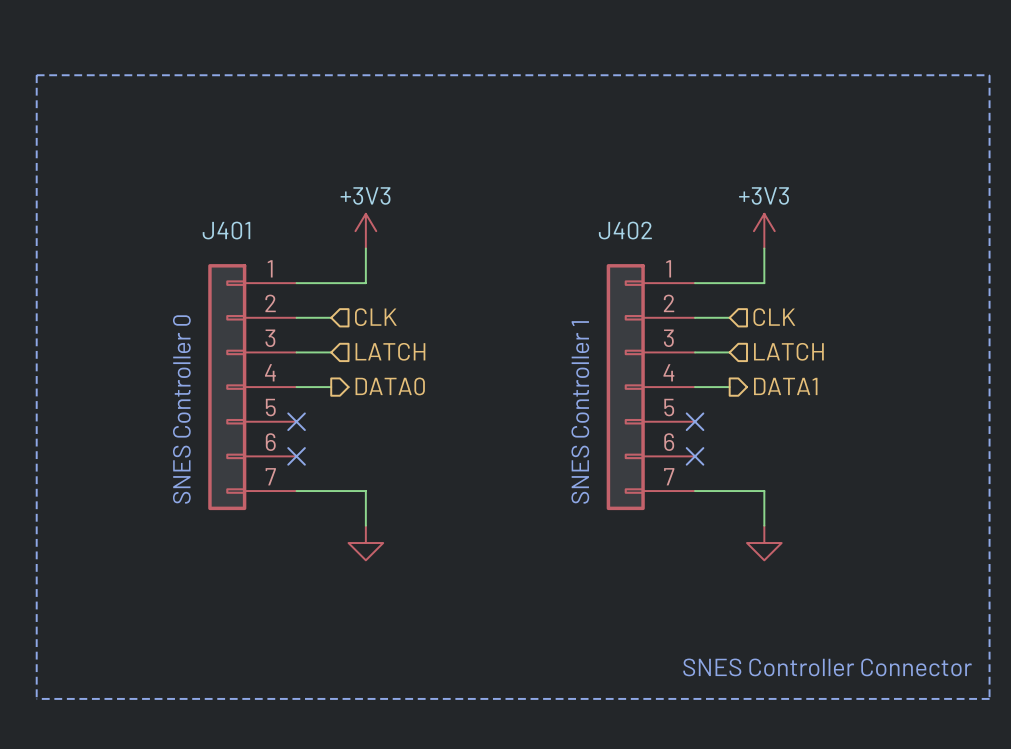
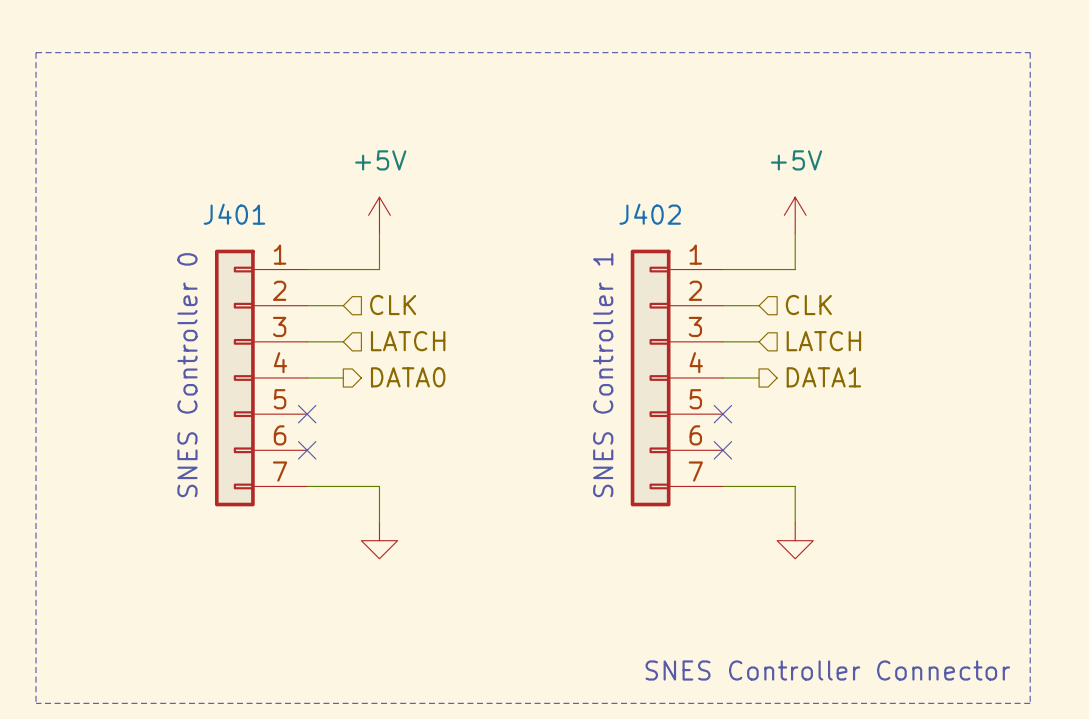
power symbol: +3V3 (365, 231) -> +5V (379, 215)
power symbol: +3V3 (764, 231) -> +5V (795, 215)

